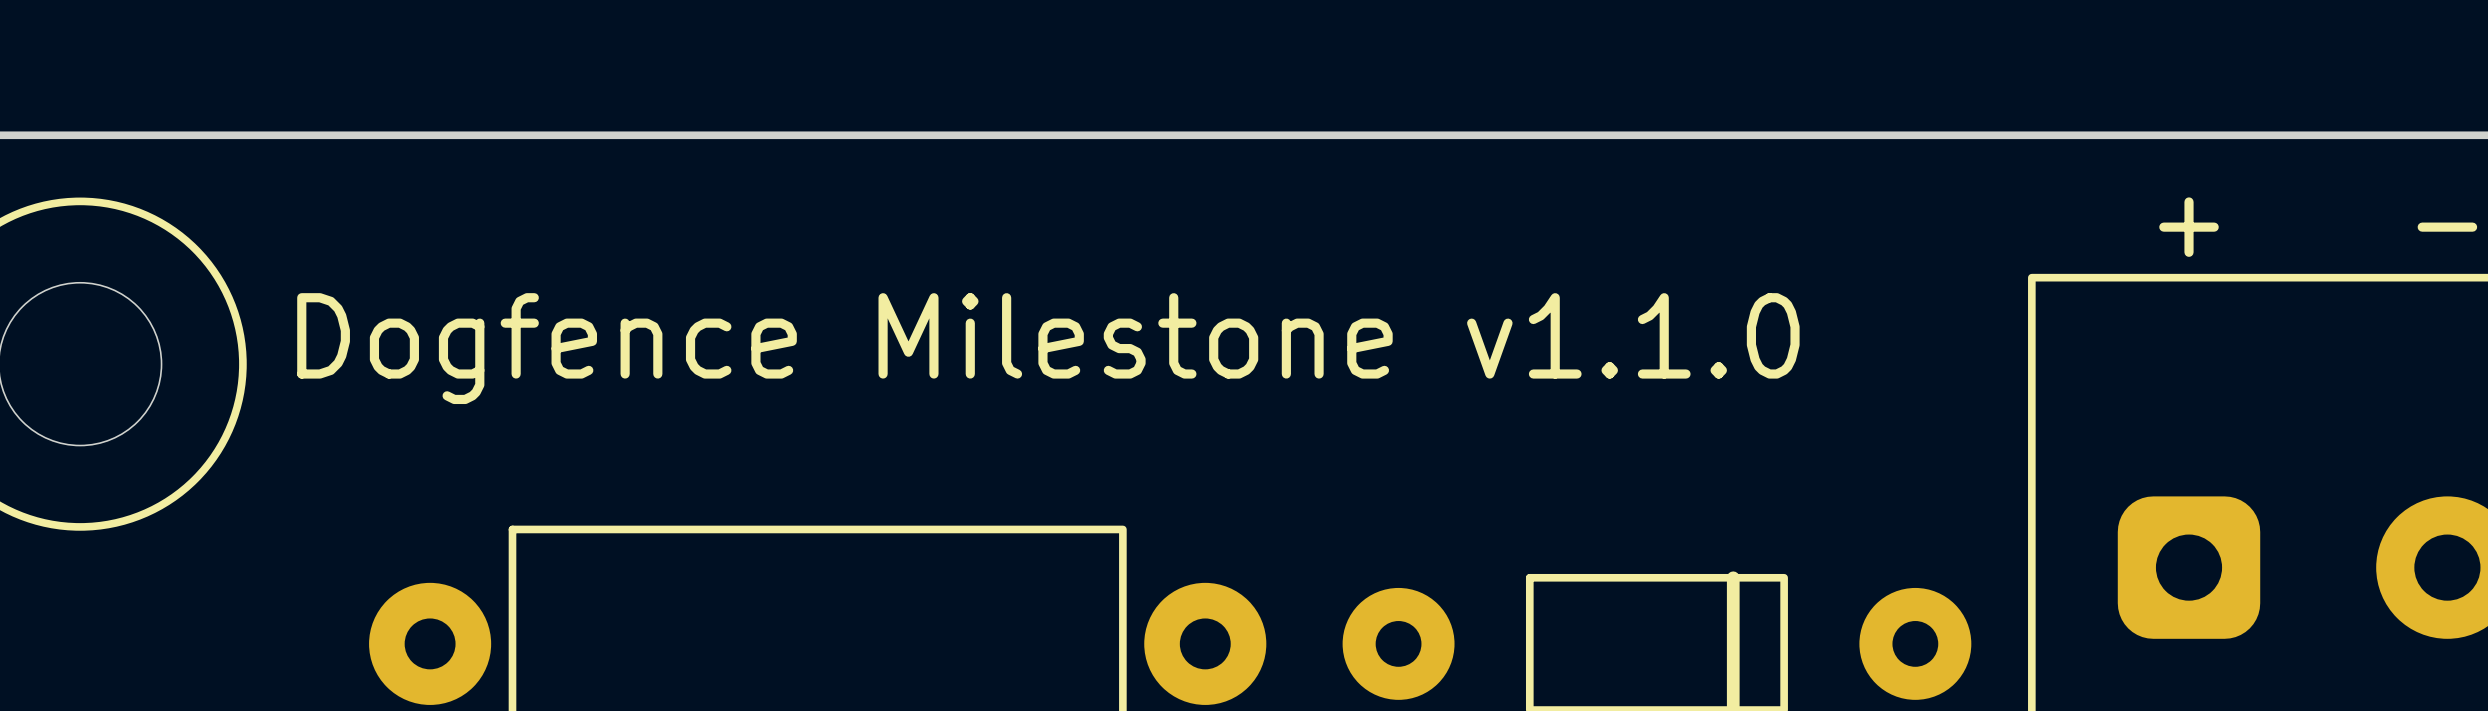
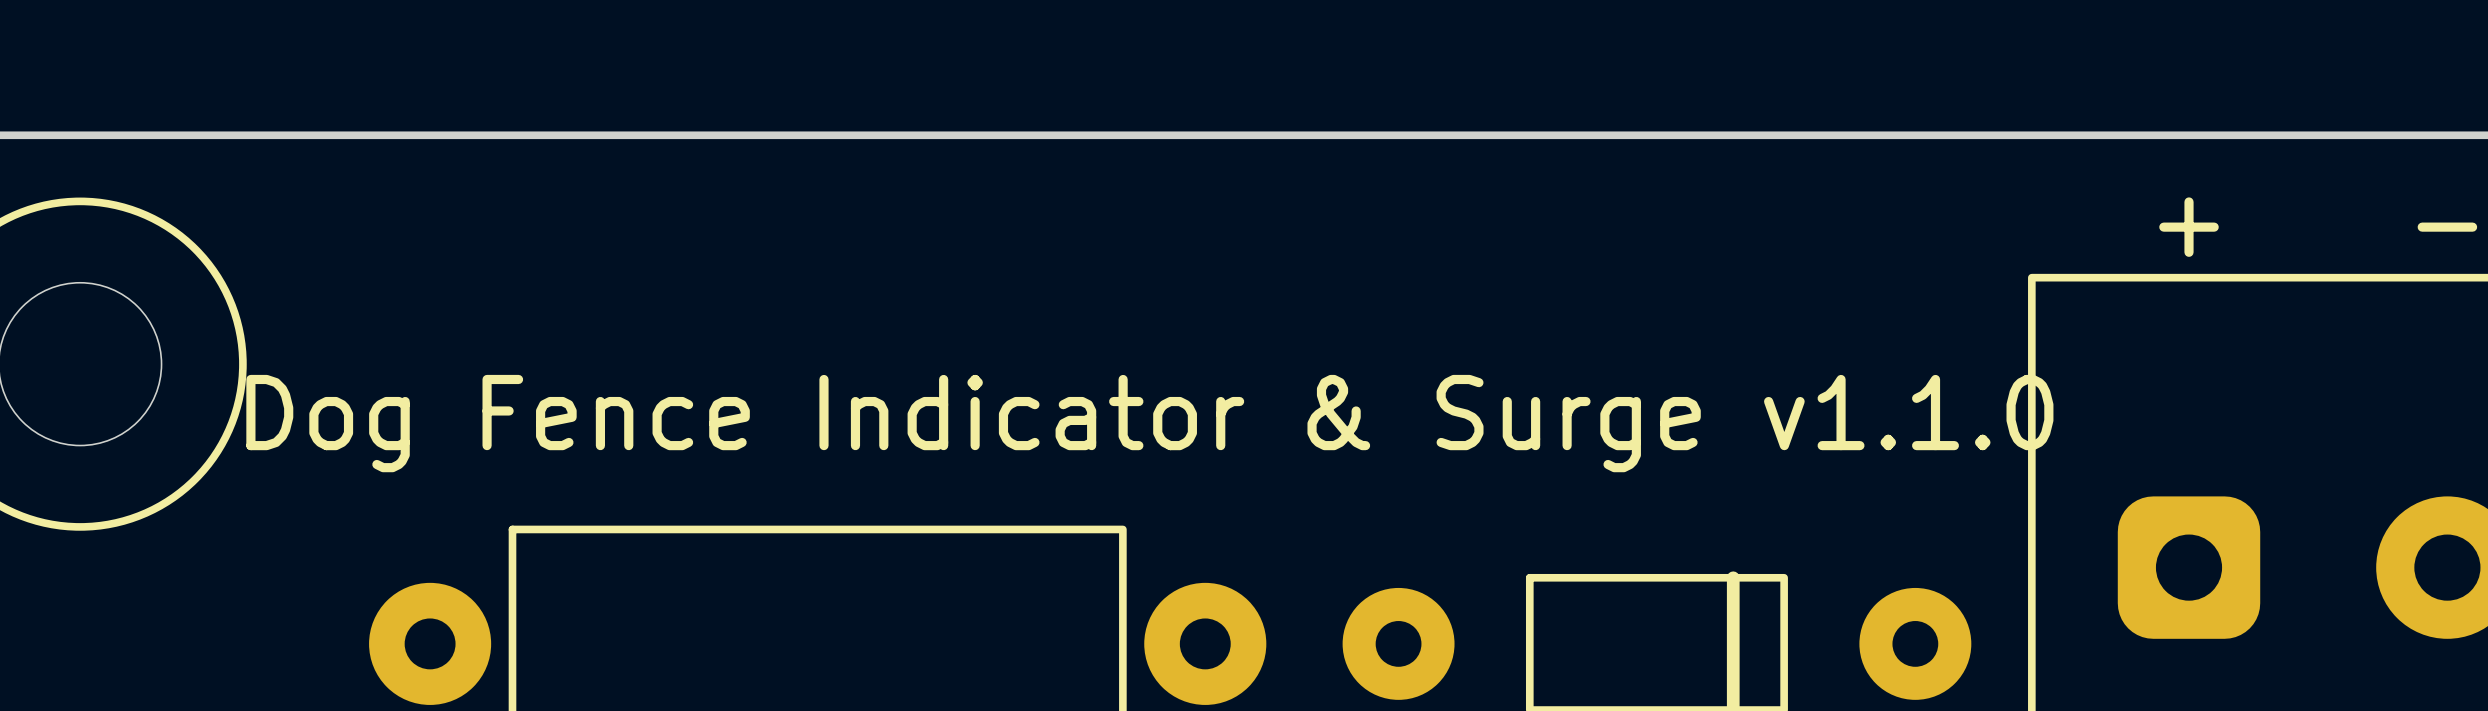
text: Dogfence Milestone v1.1.0 (1048, 348) -> Dog Fence Indicator & Surge v1.1.0 (1149, 423)

